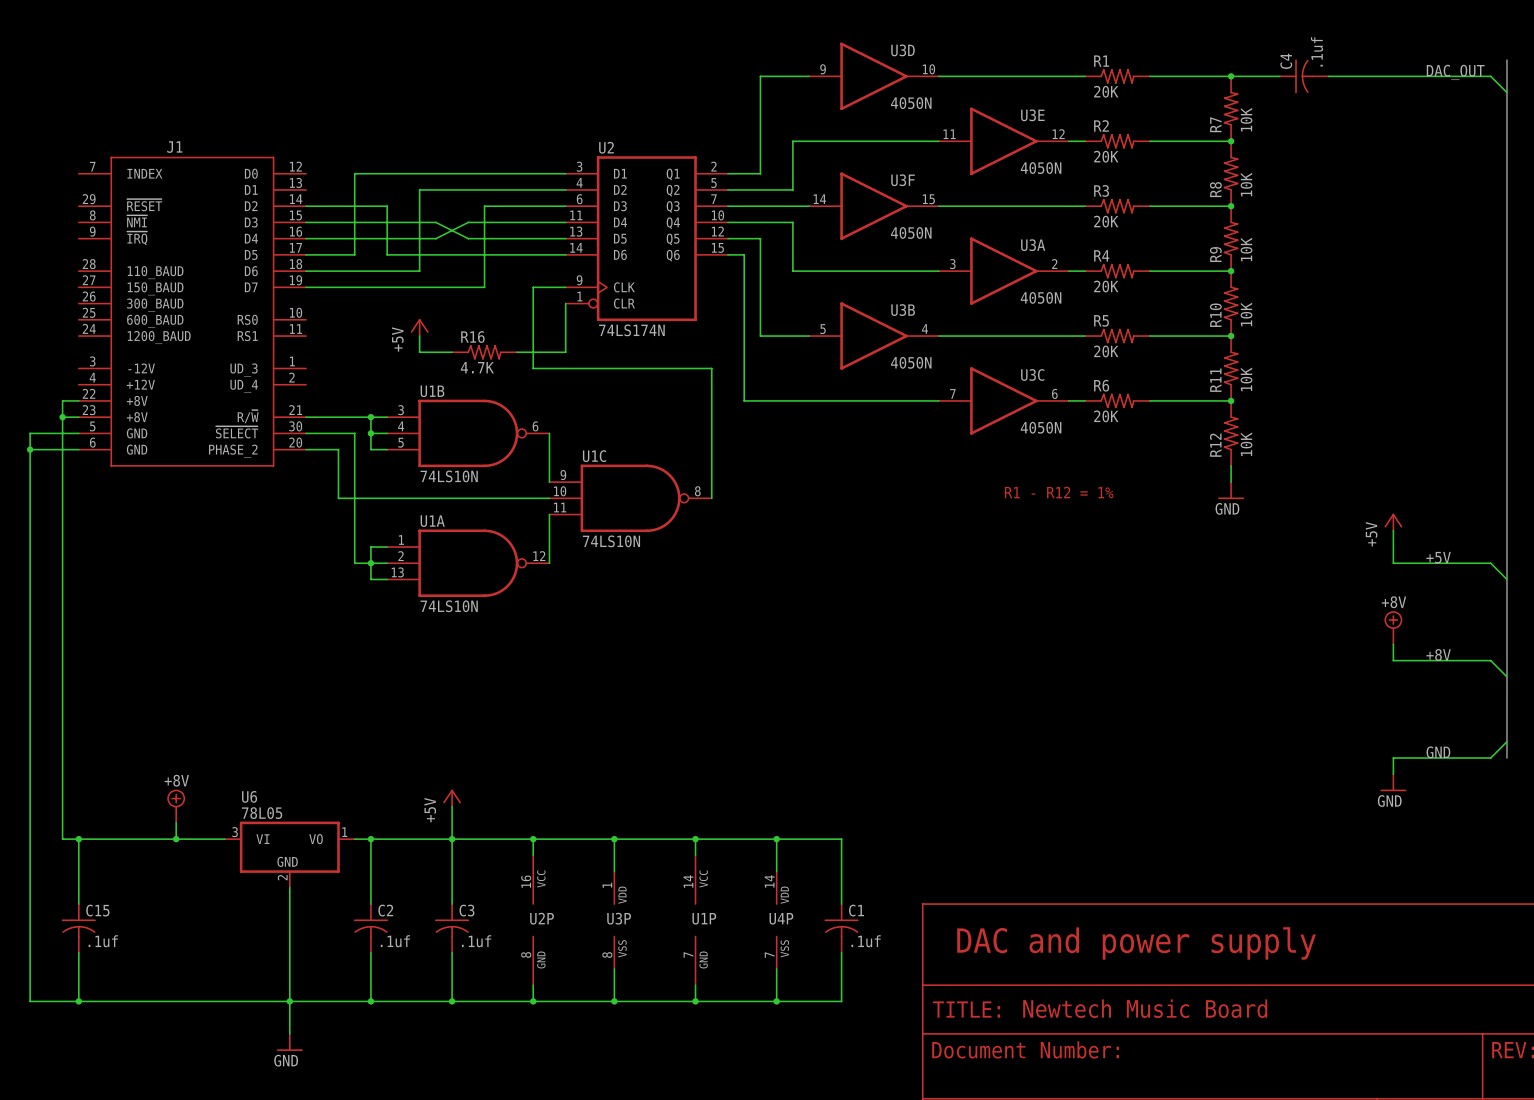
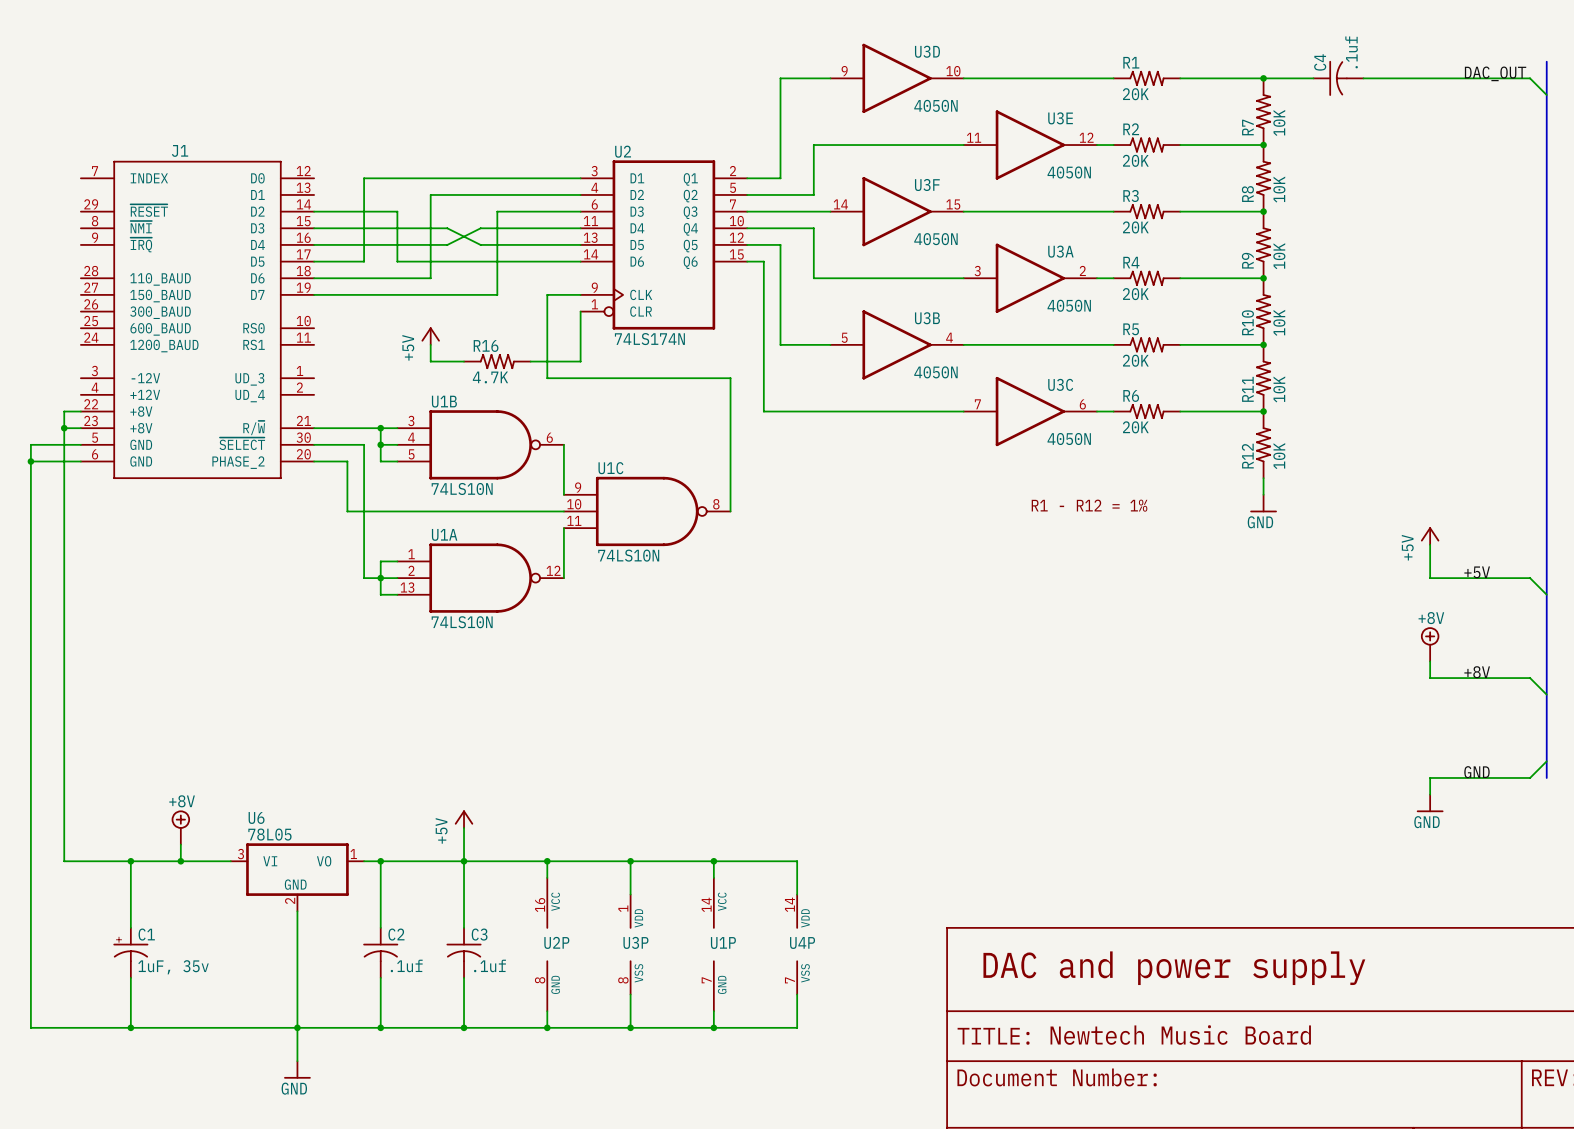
wire: (78, 839) (78, 904) -> (130, 861) (130, 927)
junction: (78, 839) -> none
junction: none -> (130, 861)
wire: (776, 839) (841, 839) (841, 904) -> none
junction: (776, 839) -> none
C1 symbol: [824, 904, 859, 953] -> [113, 927, 149, 978]
C15: .1uf (78, 928) -> none
C1 value: .1uf (866, 941) -> 1uF, 35v (173, 967)
wire: (78, 952) (78, 1001) -> (130, 977) (130, 1027)
wire: (841, 952) (841, 1001) (776, 1001) -> none
junction: (78, 1001) -> none
junction: none -> (130, 1027)
junction: (776, 1001) -> none

